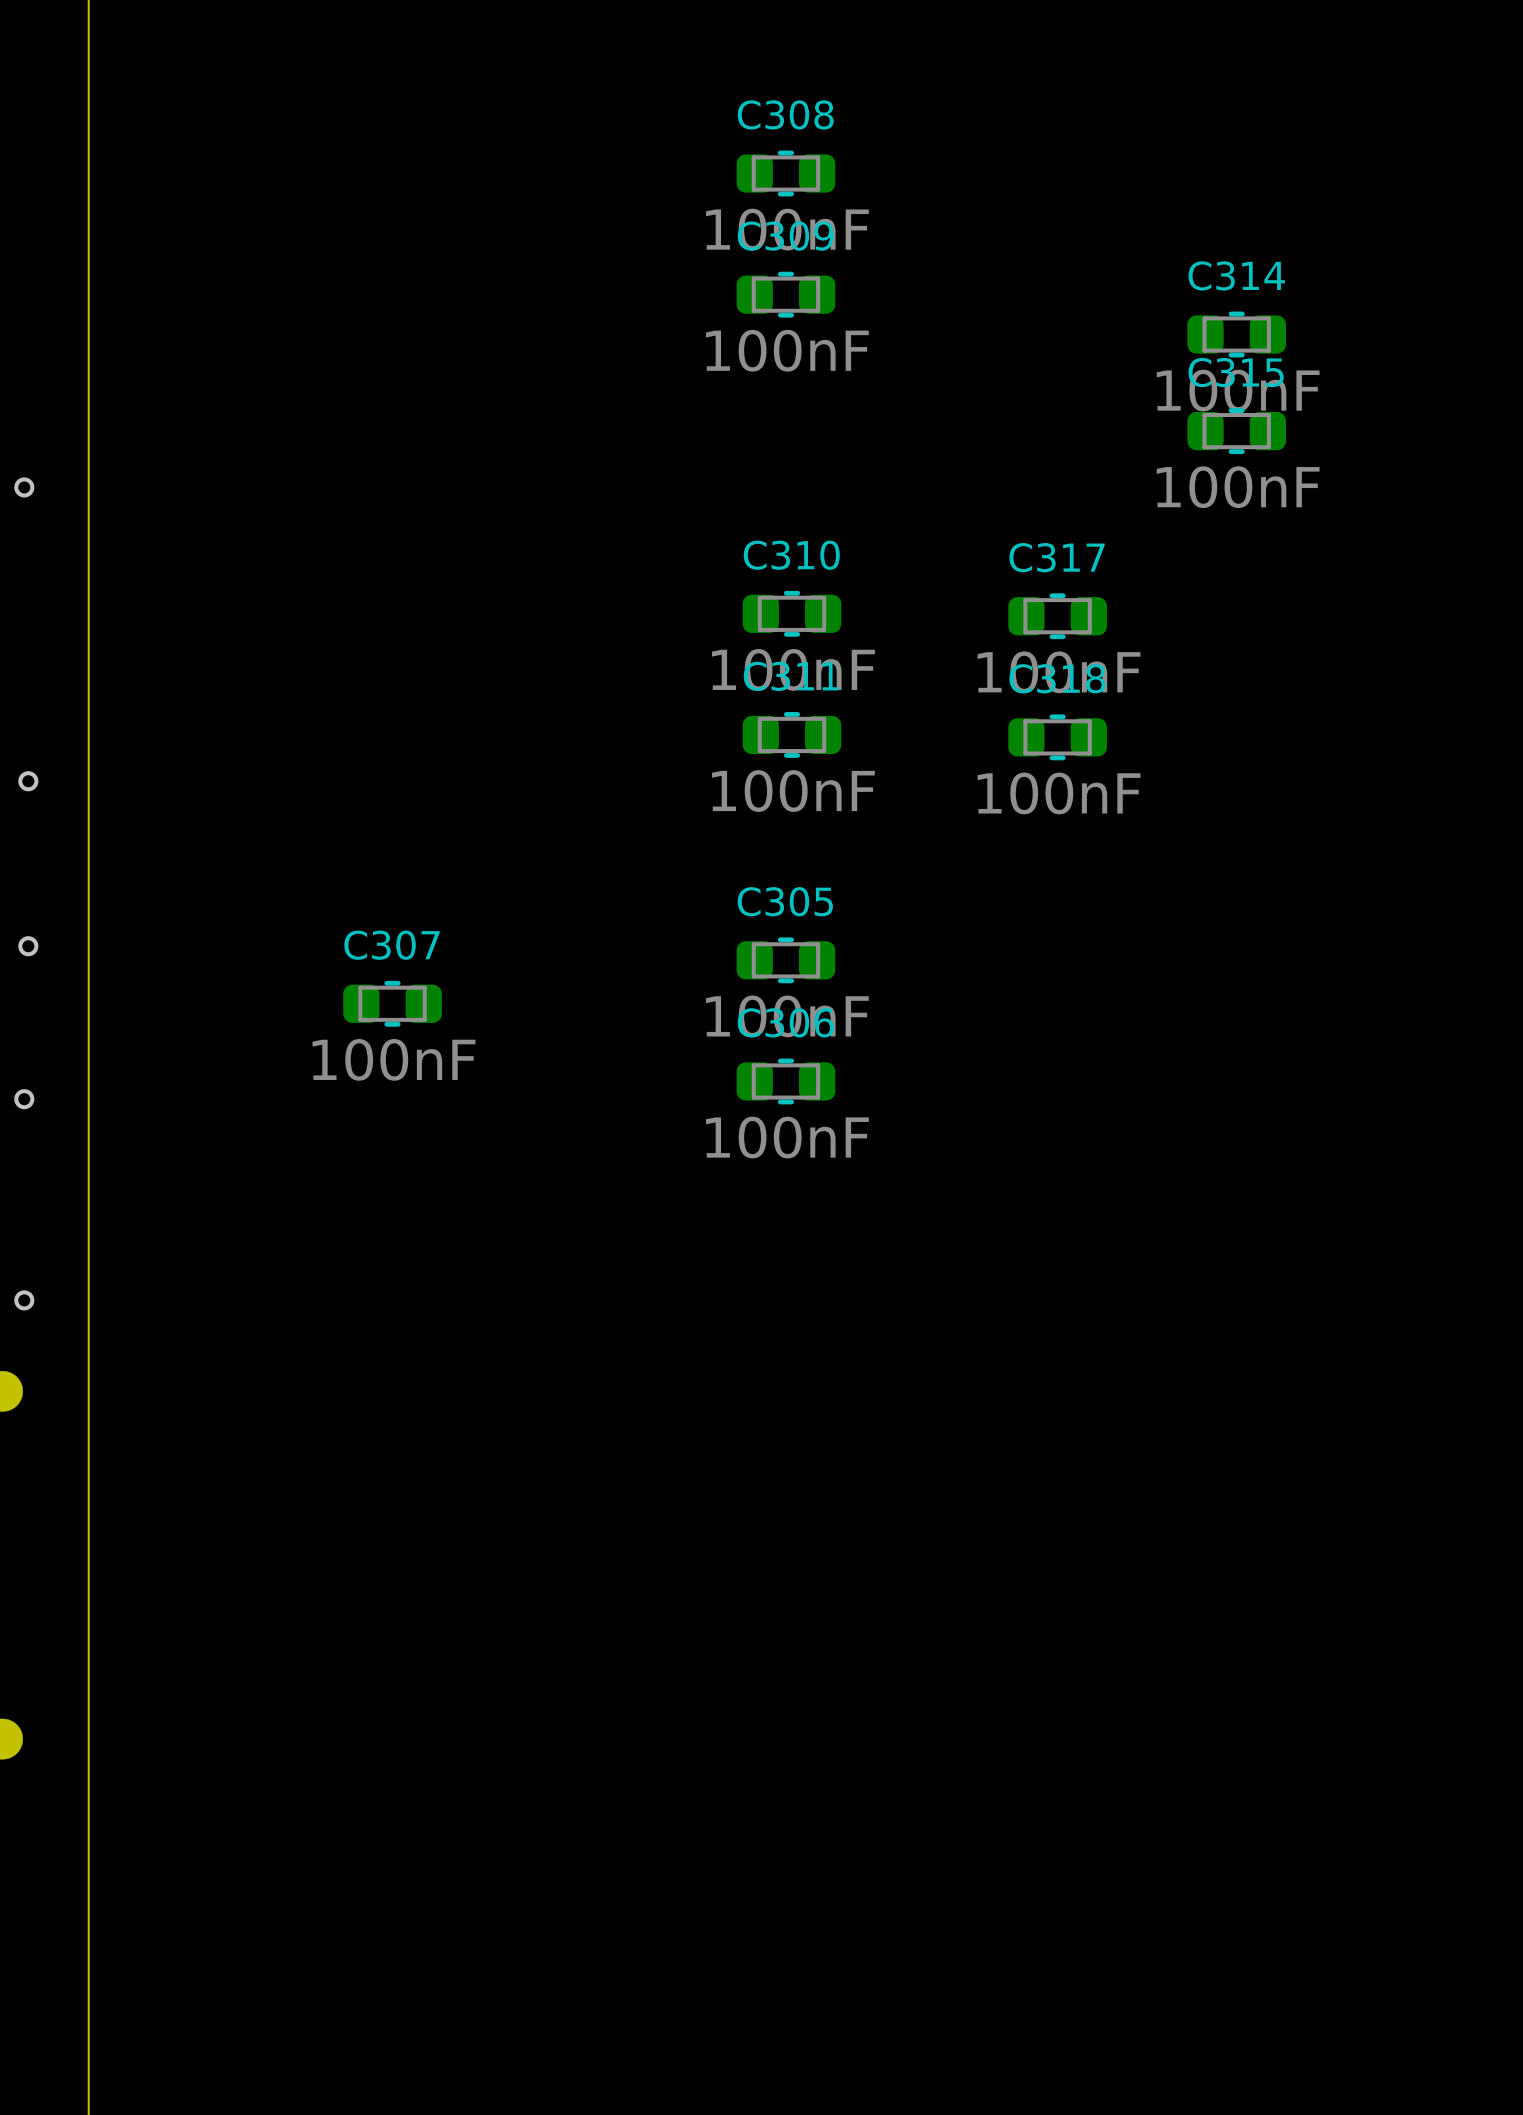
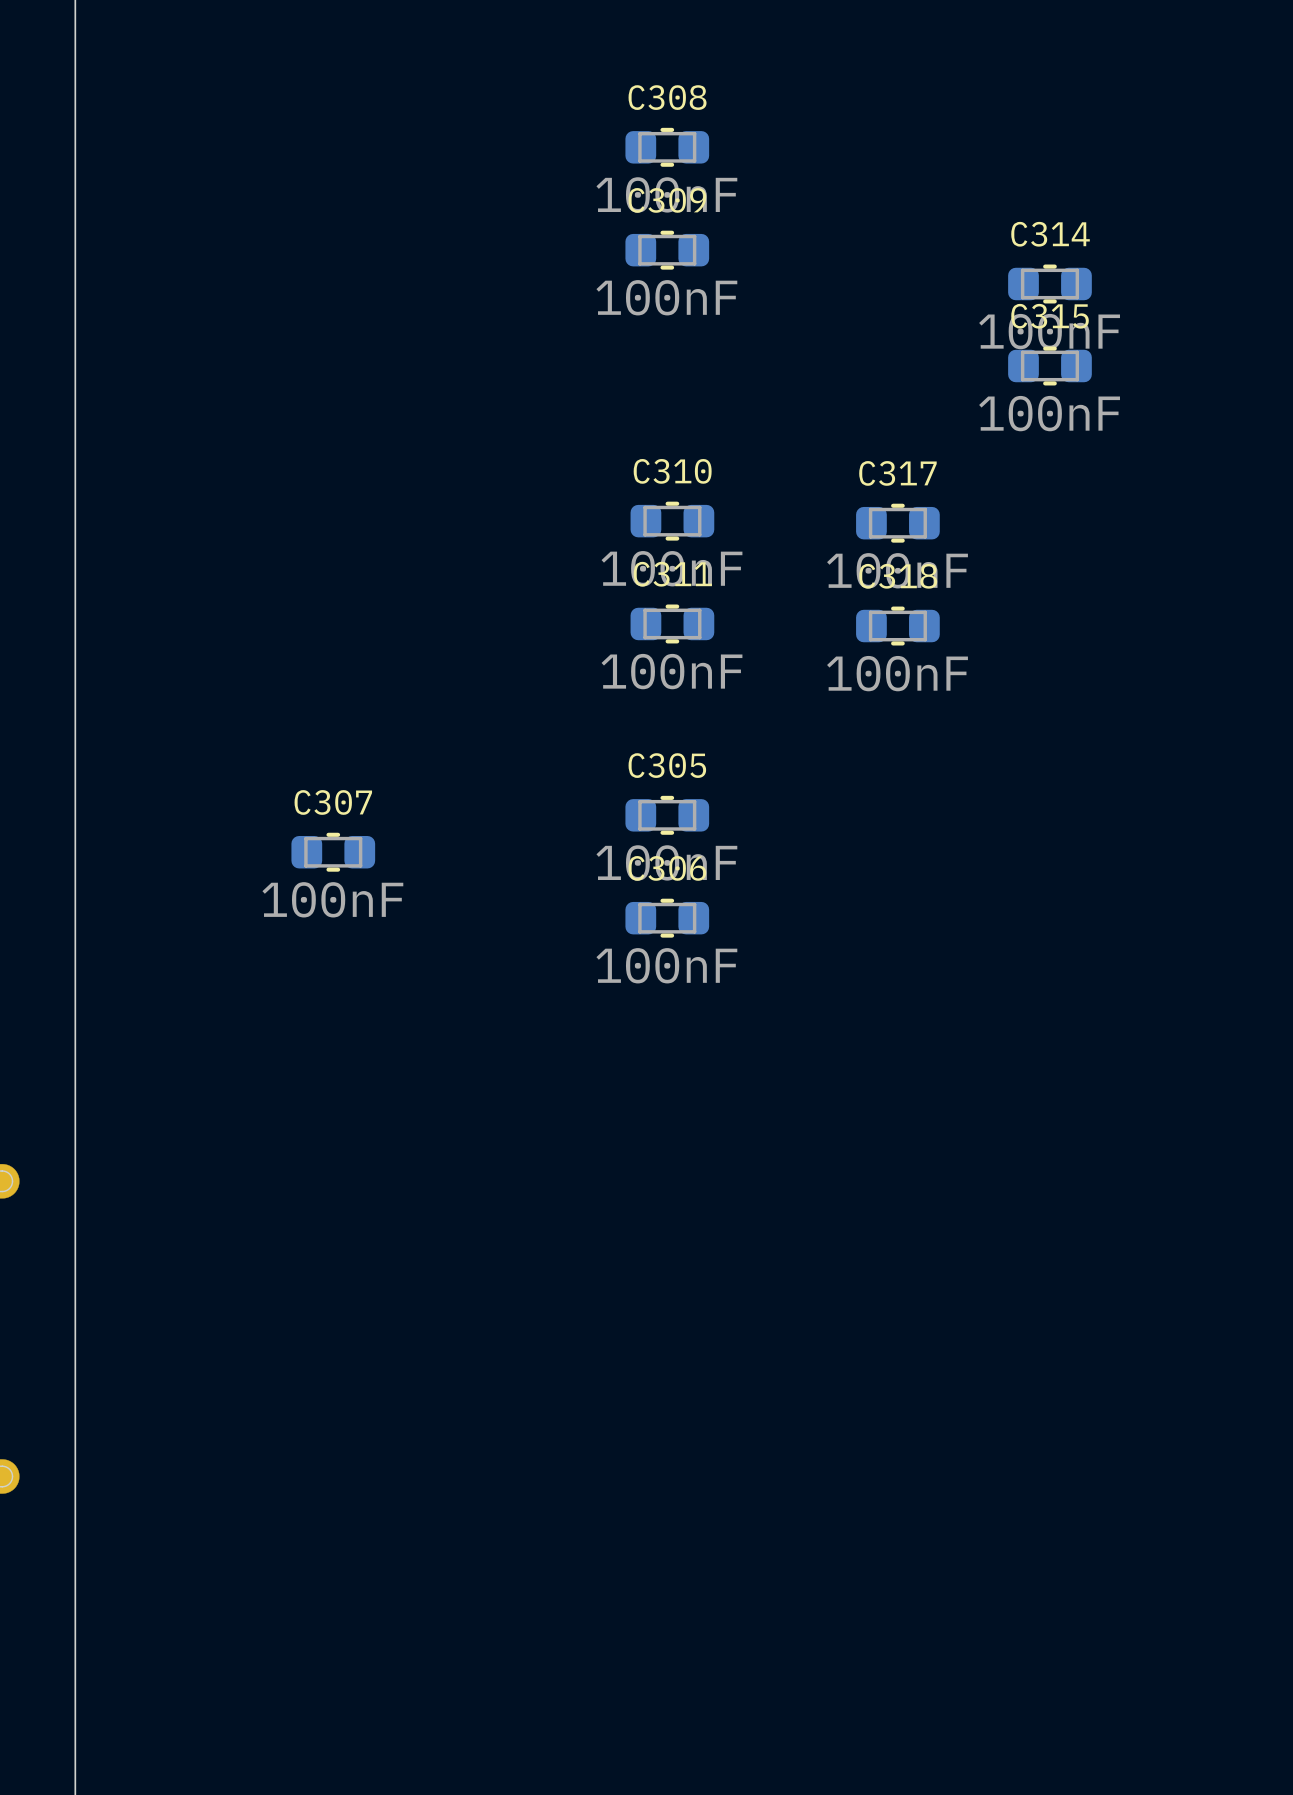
via: (24, 487) -> none
via: (28, 781) -> none
via: (28, 946) -> none
via: (24, 1099) -> none
via: (24, 1300) -> none

